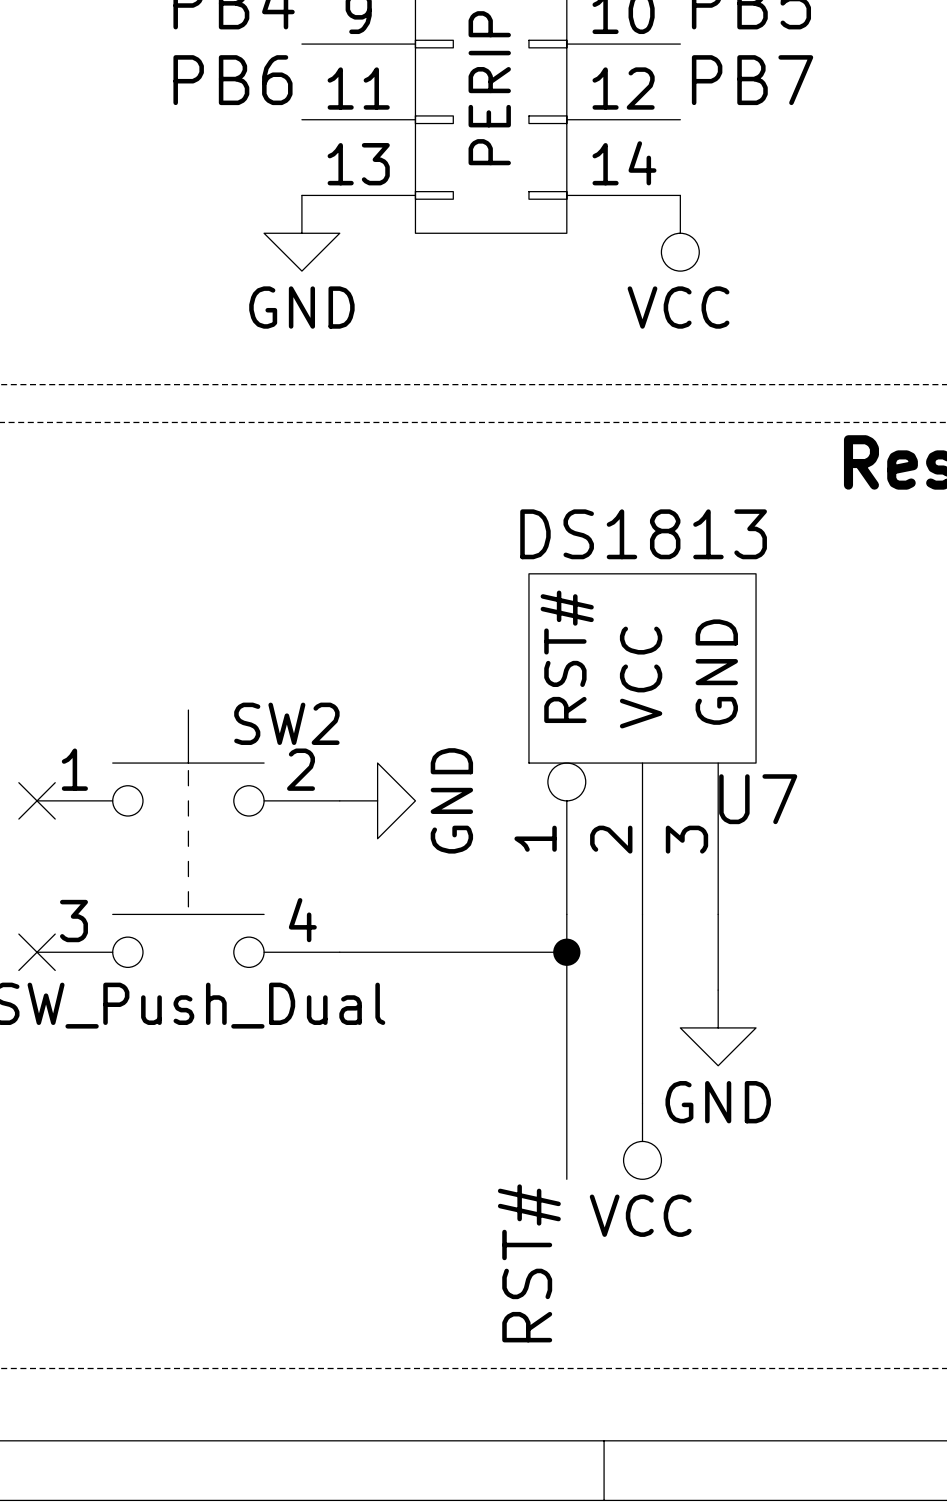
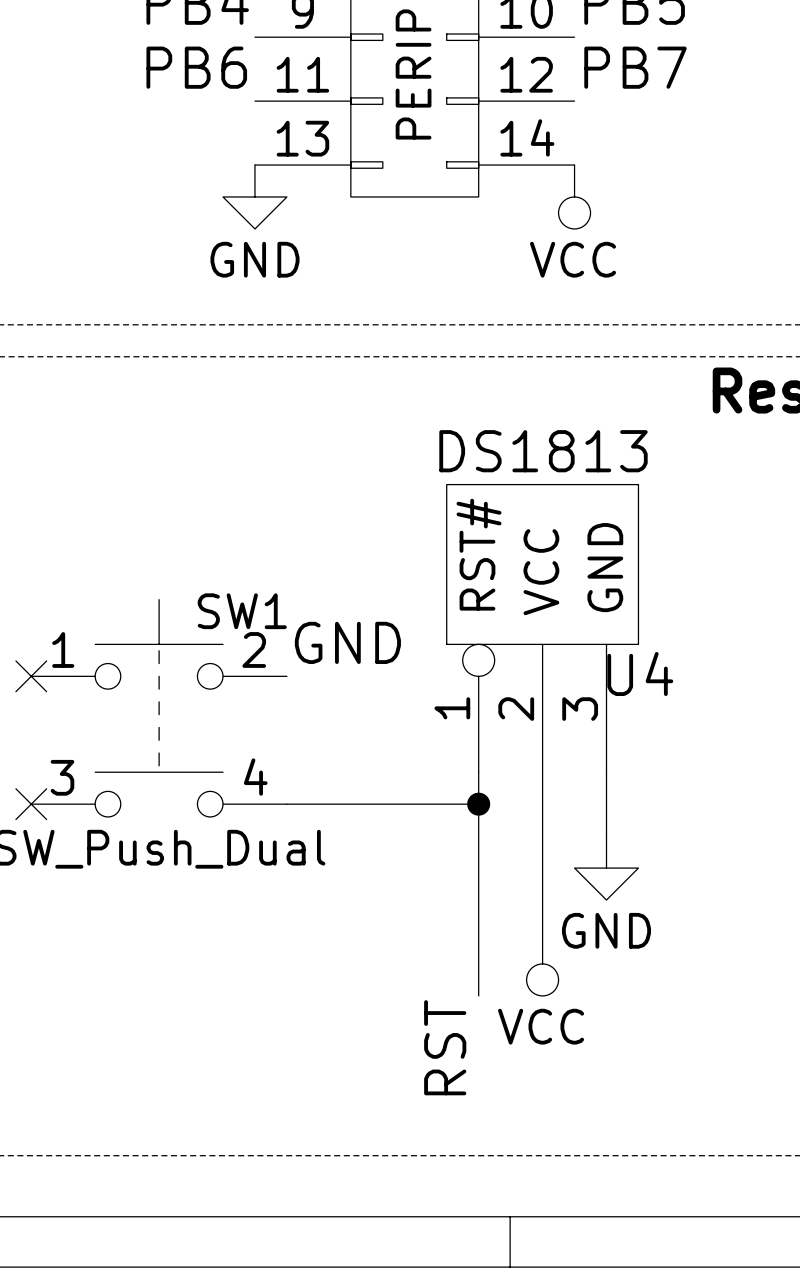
SW2 name: SW2 (286, 723) -> SW1 (242, 611)
label: none -> GND (347, 642)
U7 name: U7 (758, 799) -> U4 (640, 673)
power symbol: GND (377, 800) -> none
label: RST# (529, 1263) -> RST (445, 1047)

